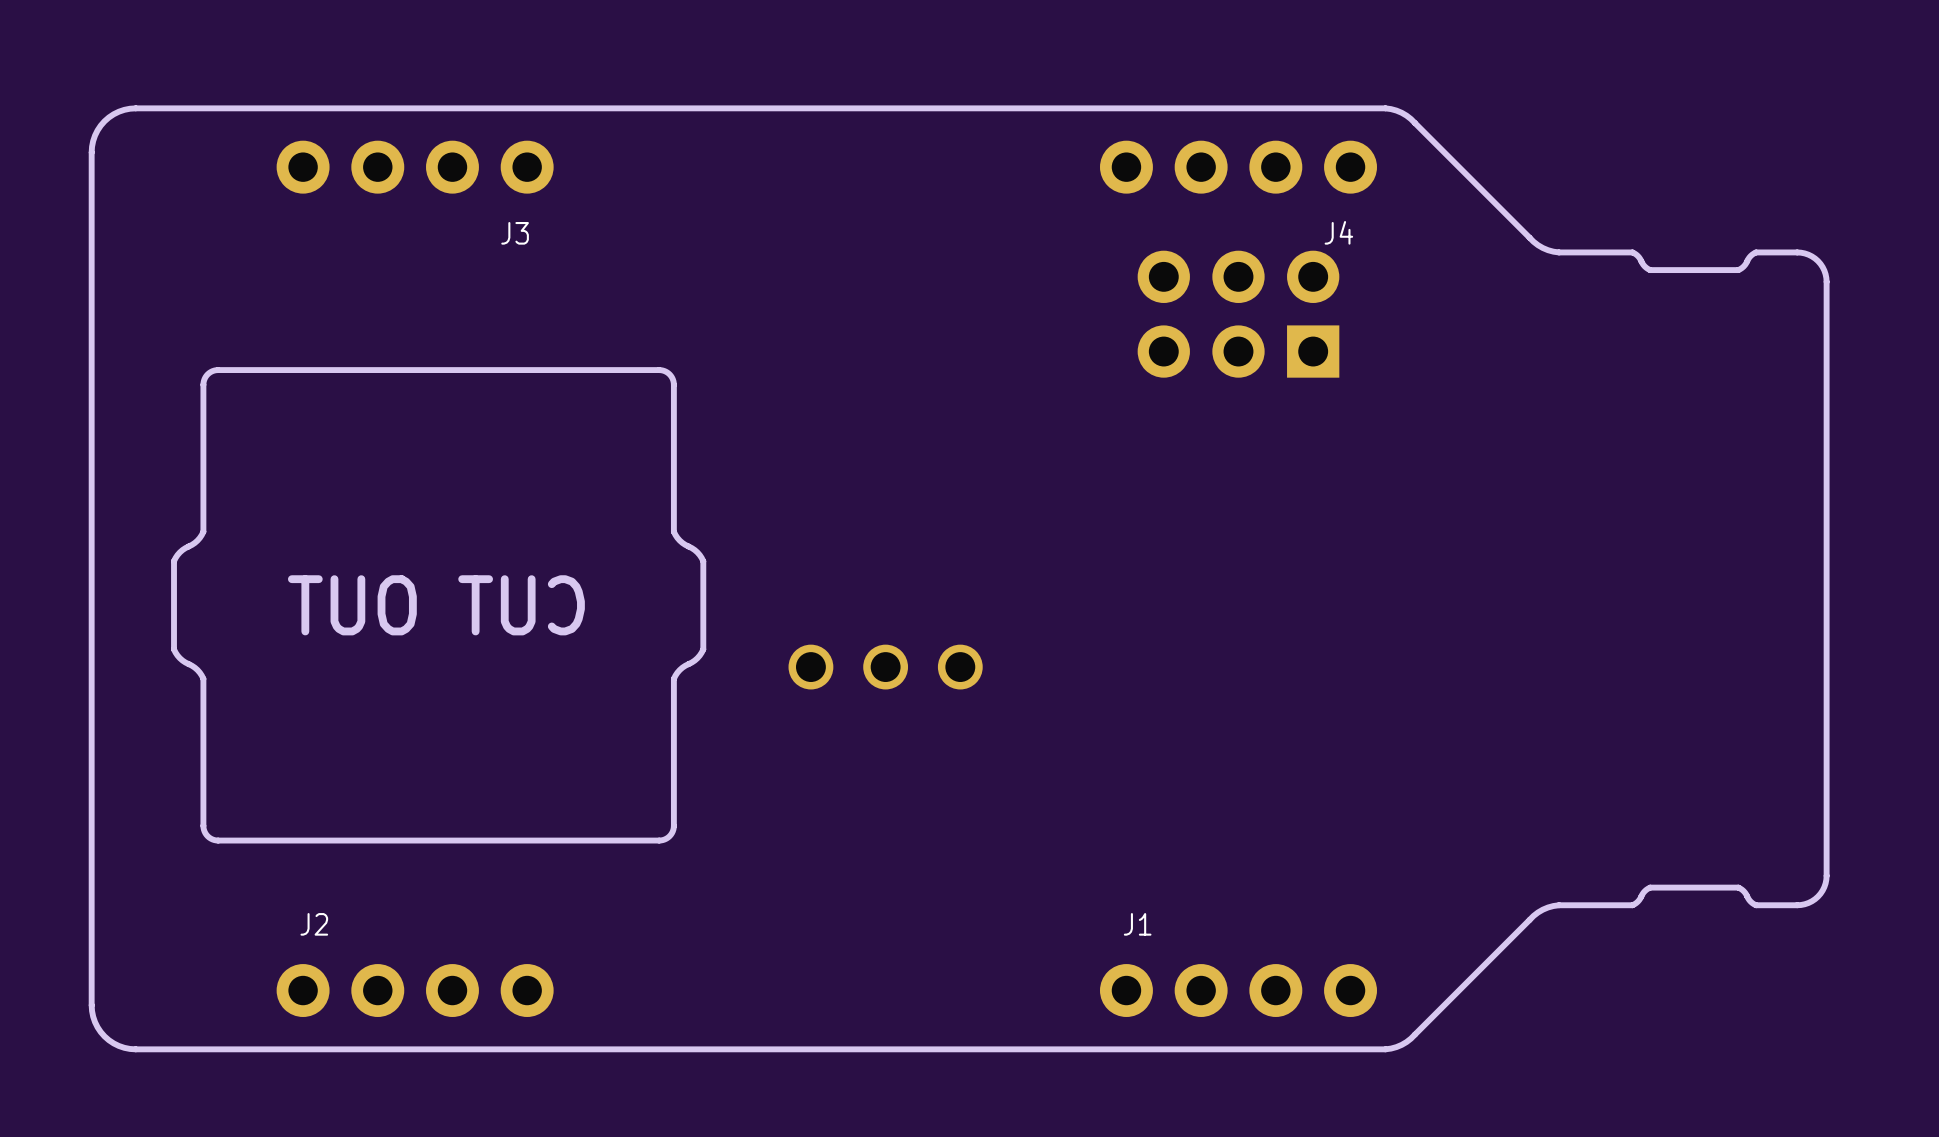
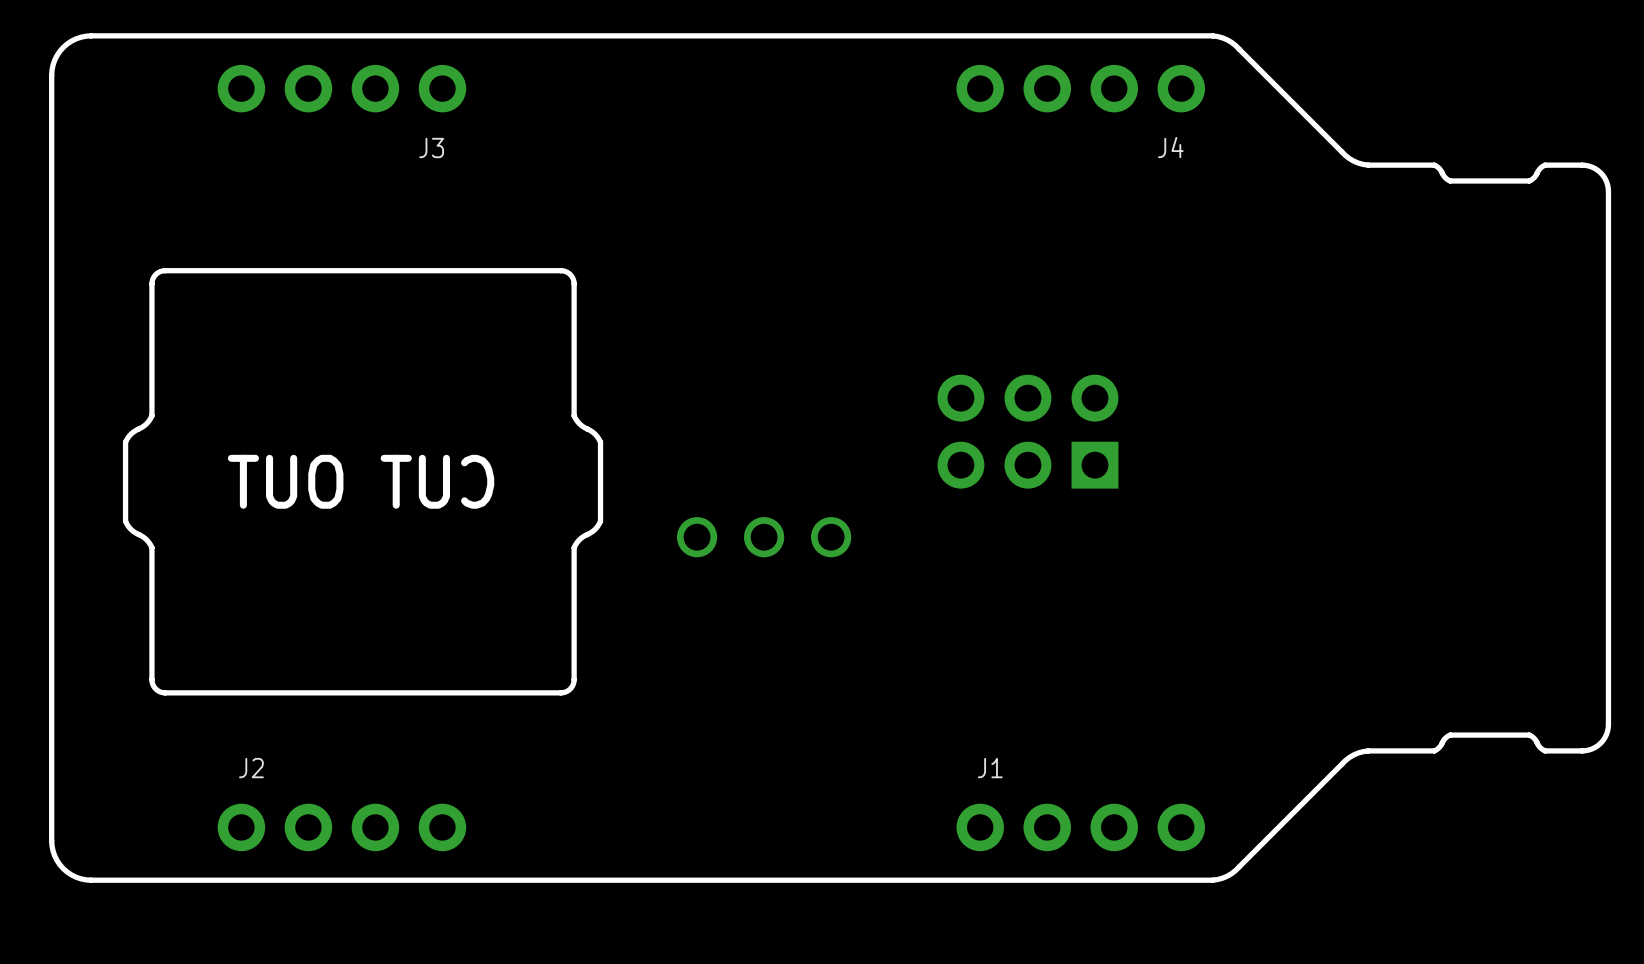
part position: (1238, 314) -> (1027, 431)

